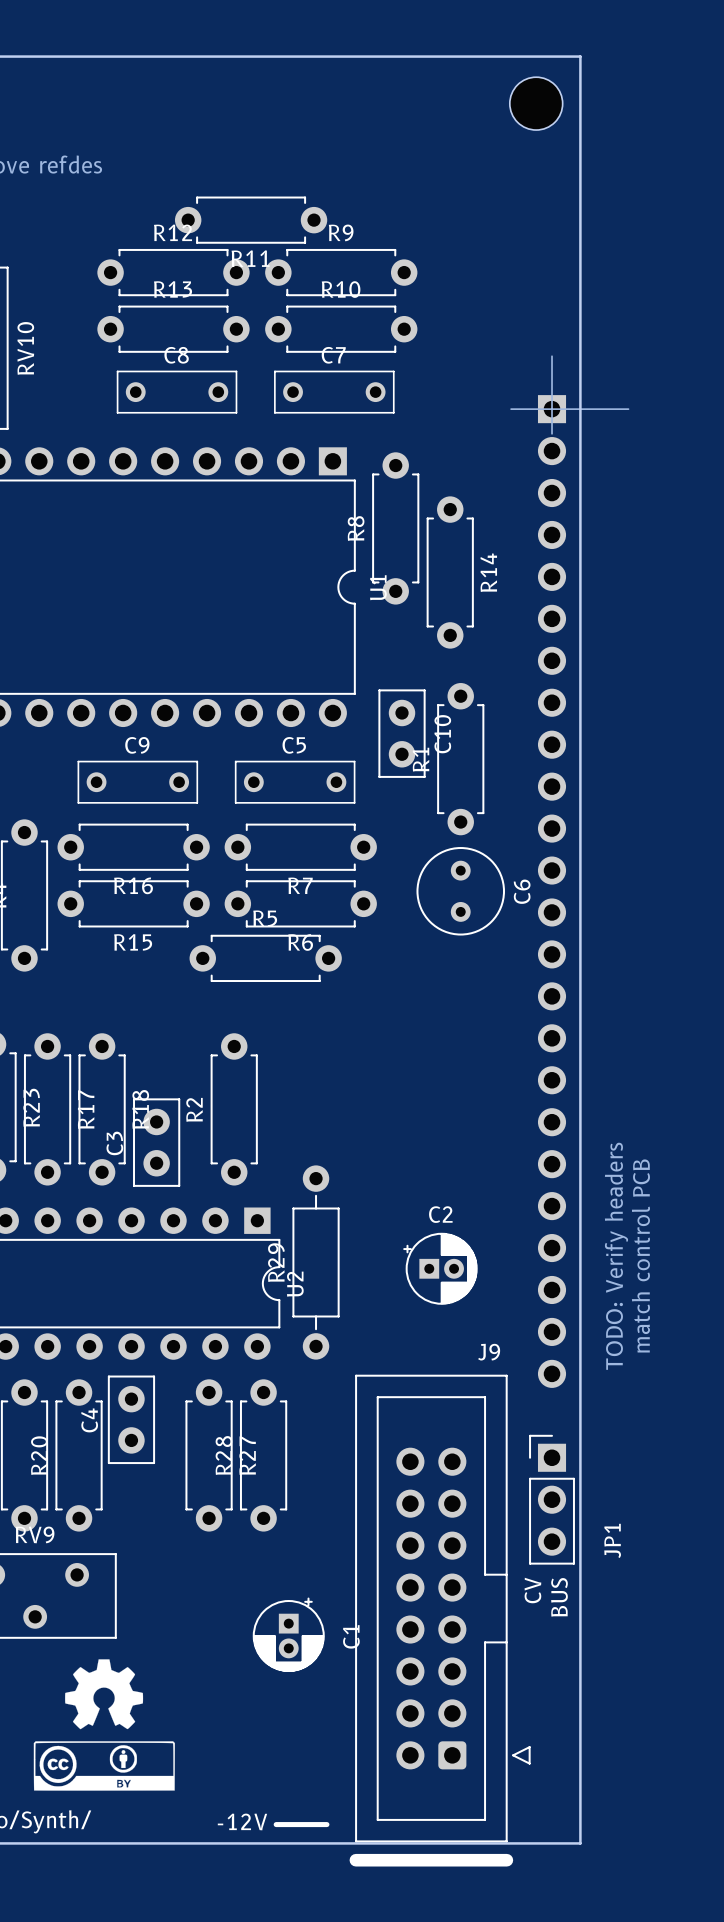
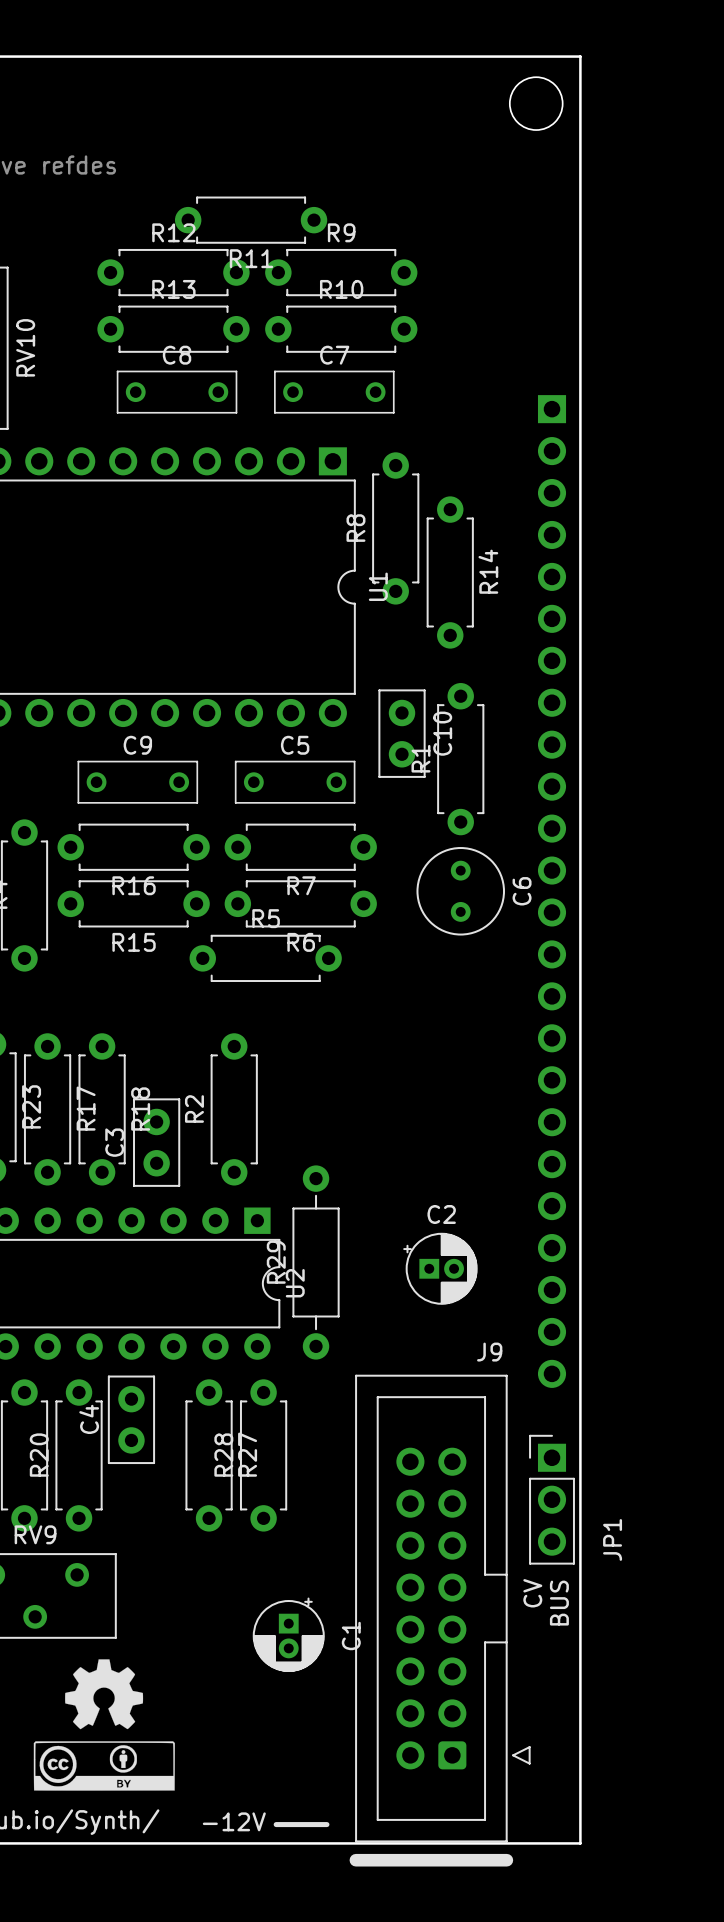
line: (552, 356) (552, 433) -> none
line: (511, 409) (628, 409) -> none
text: match control PCB (640, 1255) -> none
text: TODO: Verify headers (616, 1256) -> none

